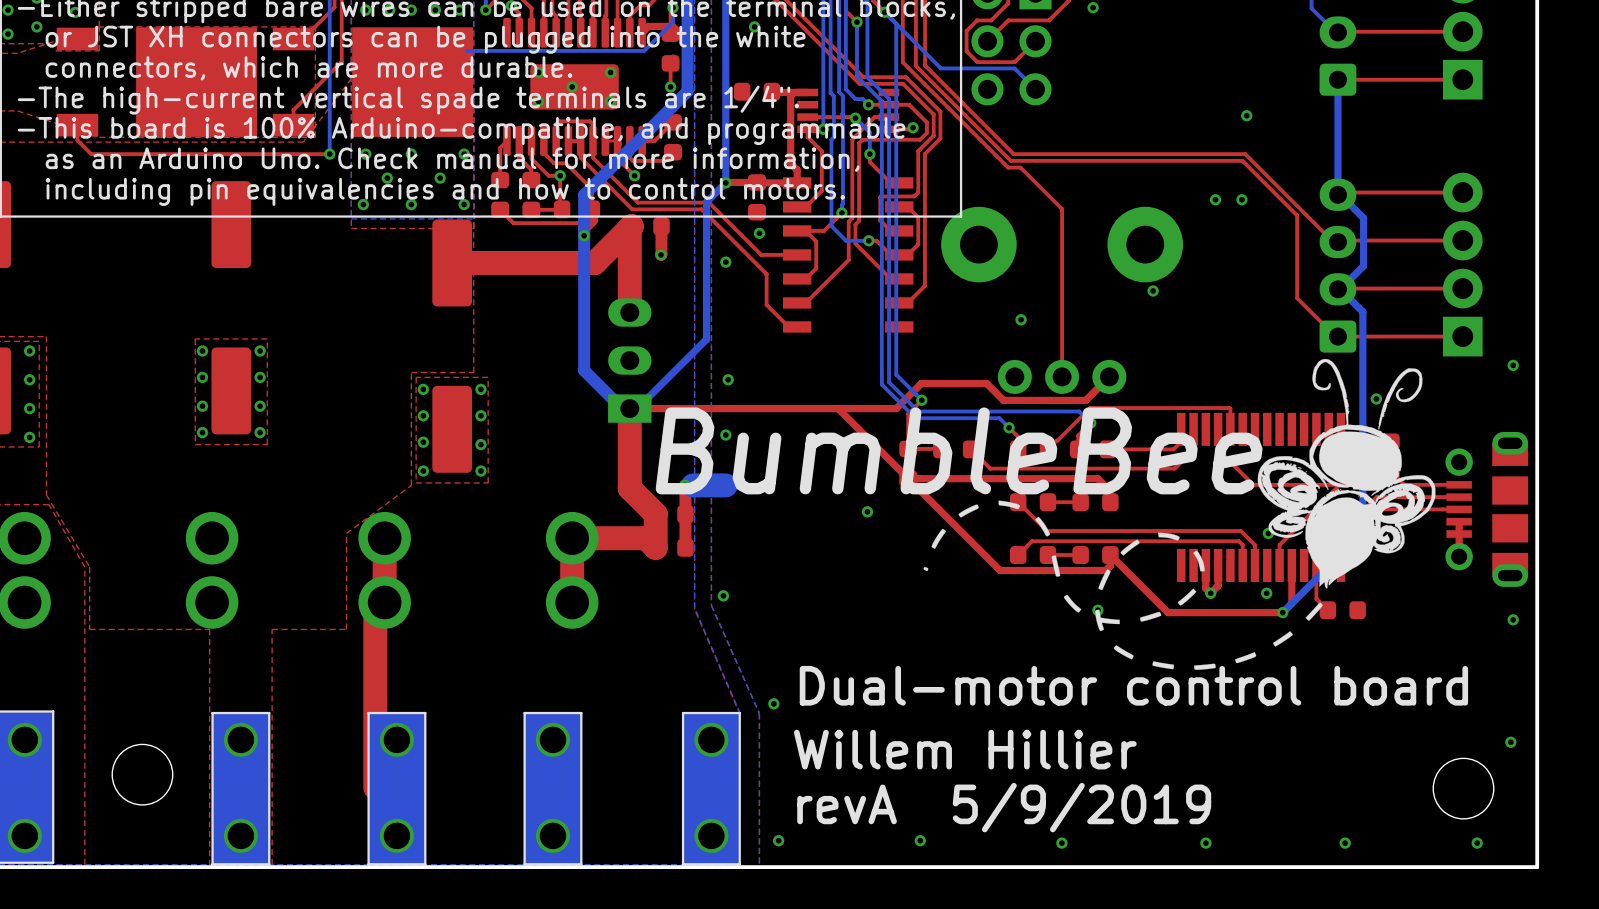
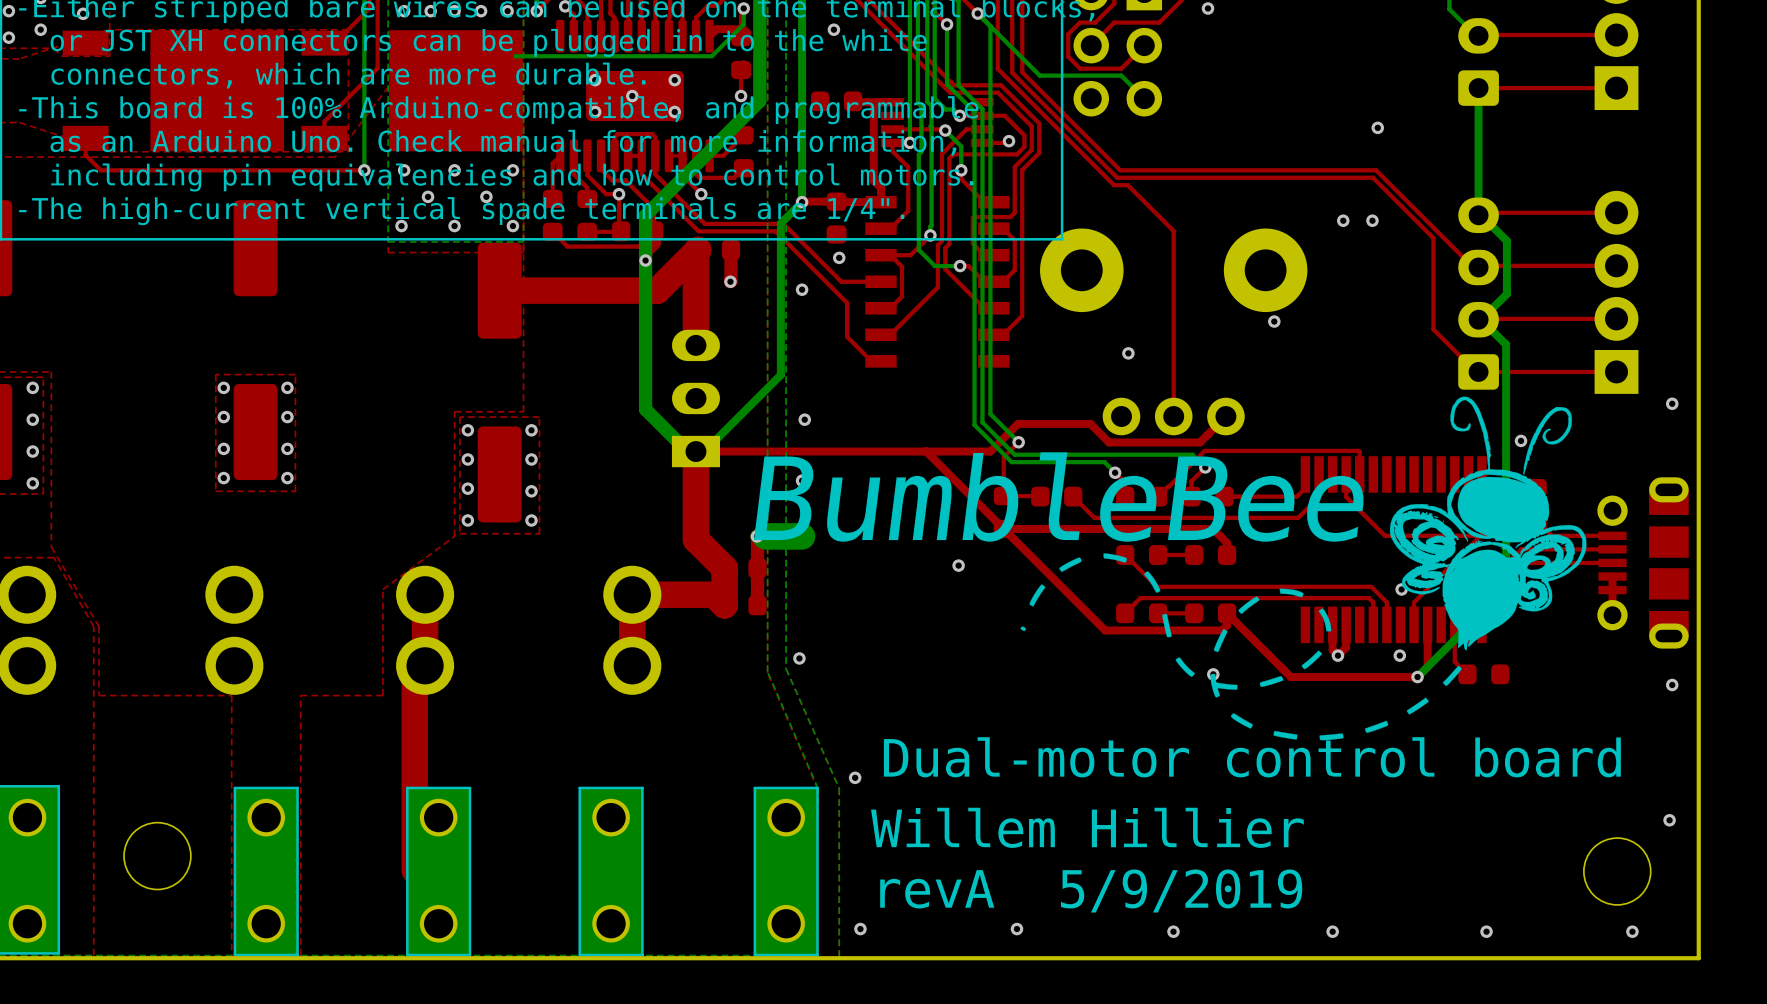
text: or JST XH connectors can be plugged into the white (425, 39) -> or JST XH connectors can be plugged in to the white (488, 42)
text: -The high-current vertical spade terminals are 1/4". (408, 100) -> -This board is 100% Arduino-compatible, and programmable (498, 110)
text: -This board is 100% Arduino-compatible, and programmable (461, 131) -> as an Arduino Uno. Check manual for more information, (503, 142)
text: as an Arduino Uno. Check manual for more information, (452, 159) -> including pin equivalencies and how to control motors. (512, 177)
text: including pin equivalencies and how to control motors. (445, 191) -> -The high-current vertical spade terminals are 1/4". (461, 211)

